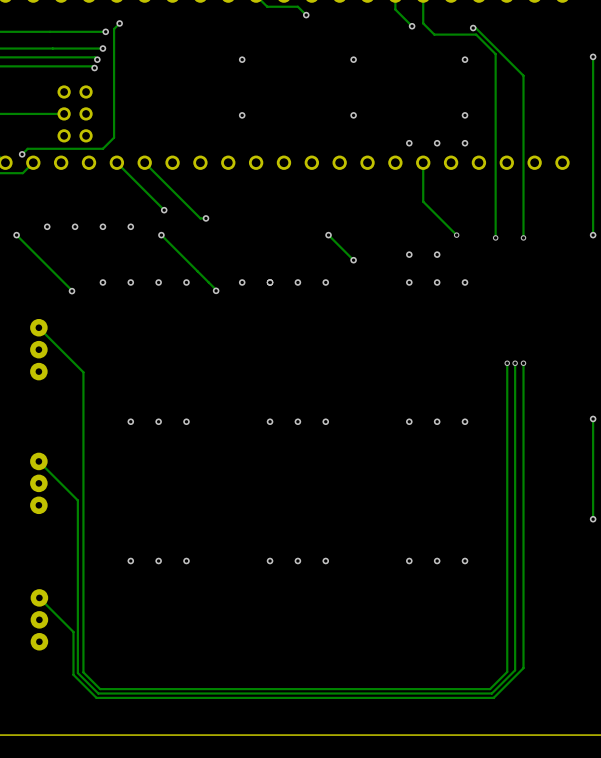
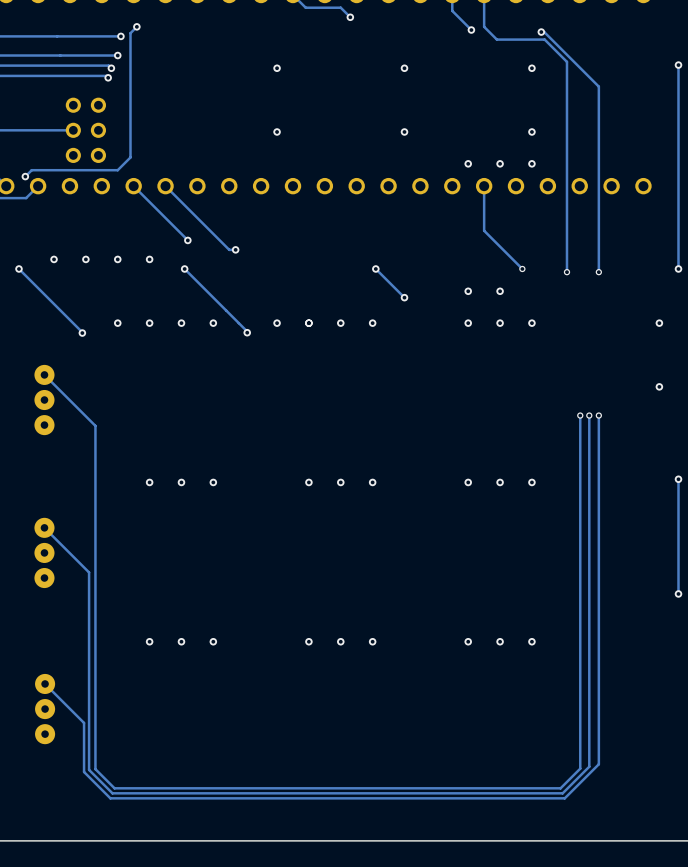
via: none -> (659, 323)
via: none -> (659, 386)

